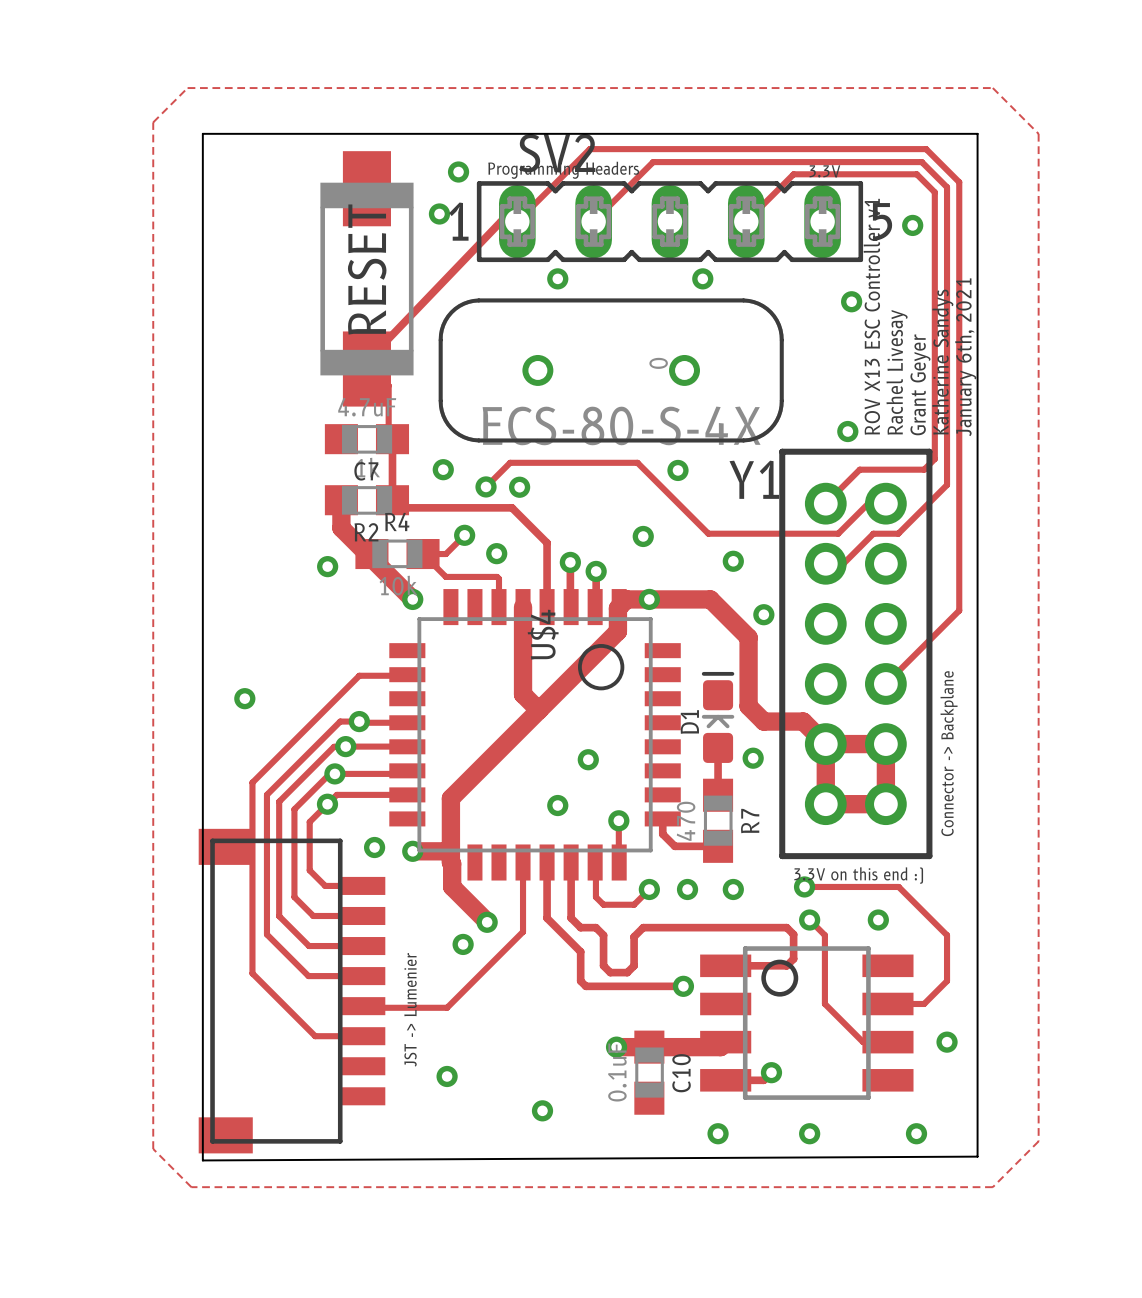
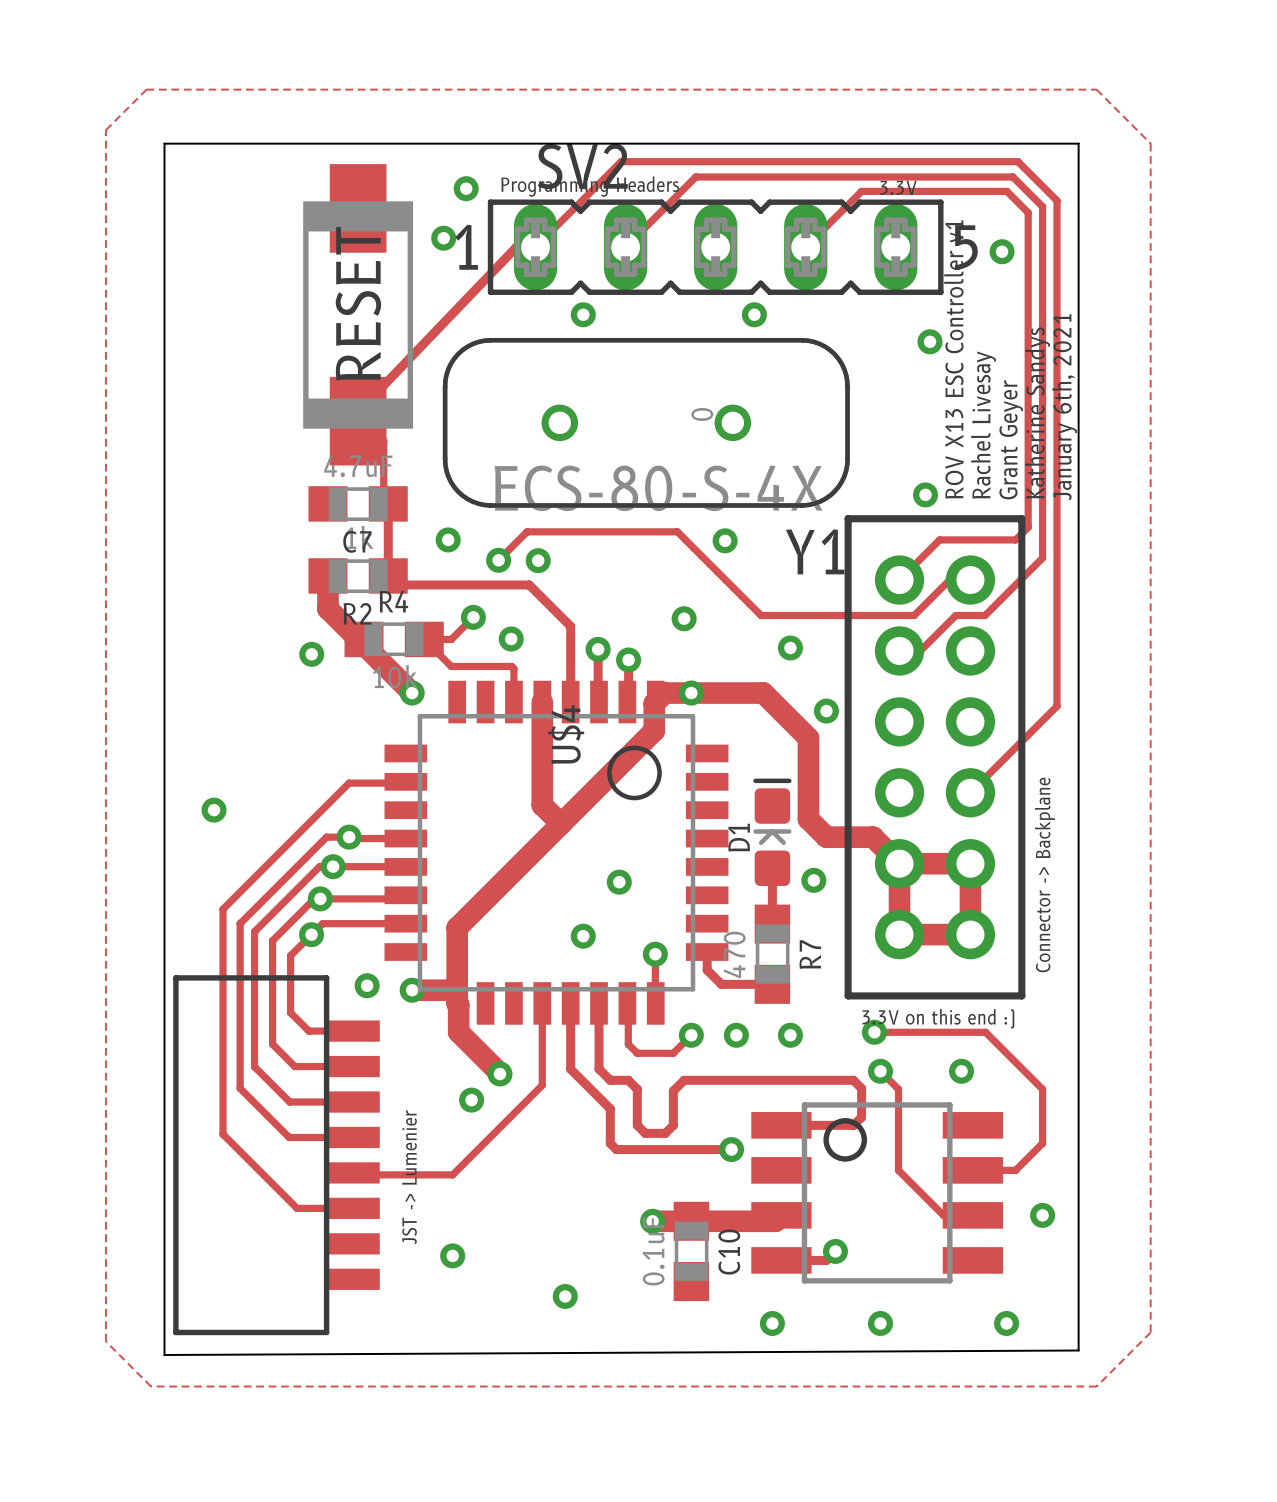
part footprint: [198, 828, 386, 1154] -> [173, 975, 380, 1336]

